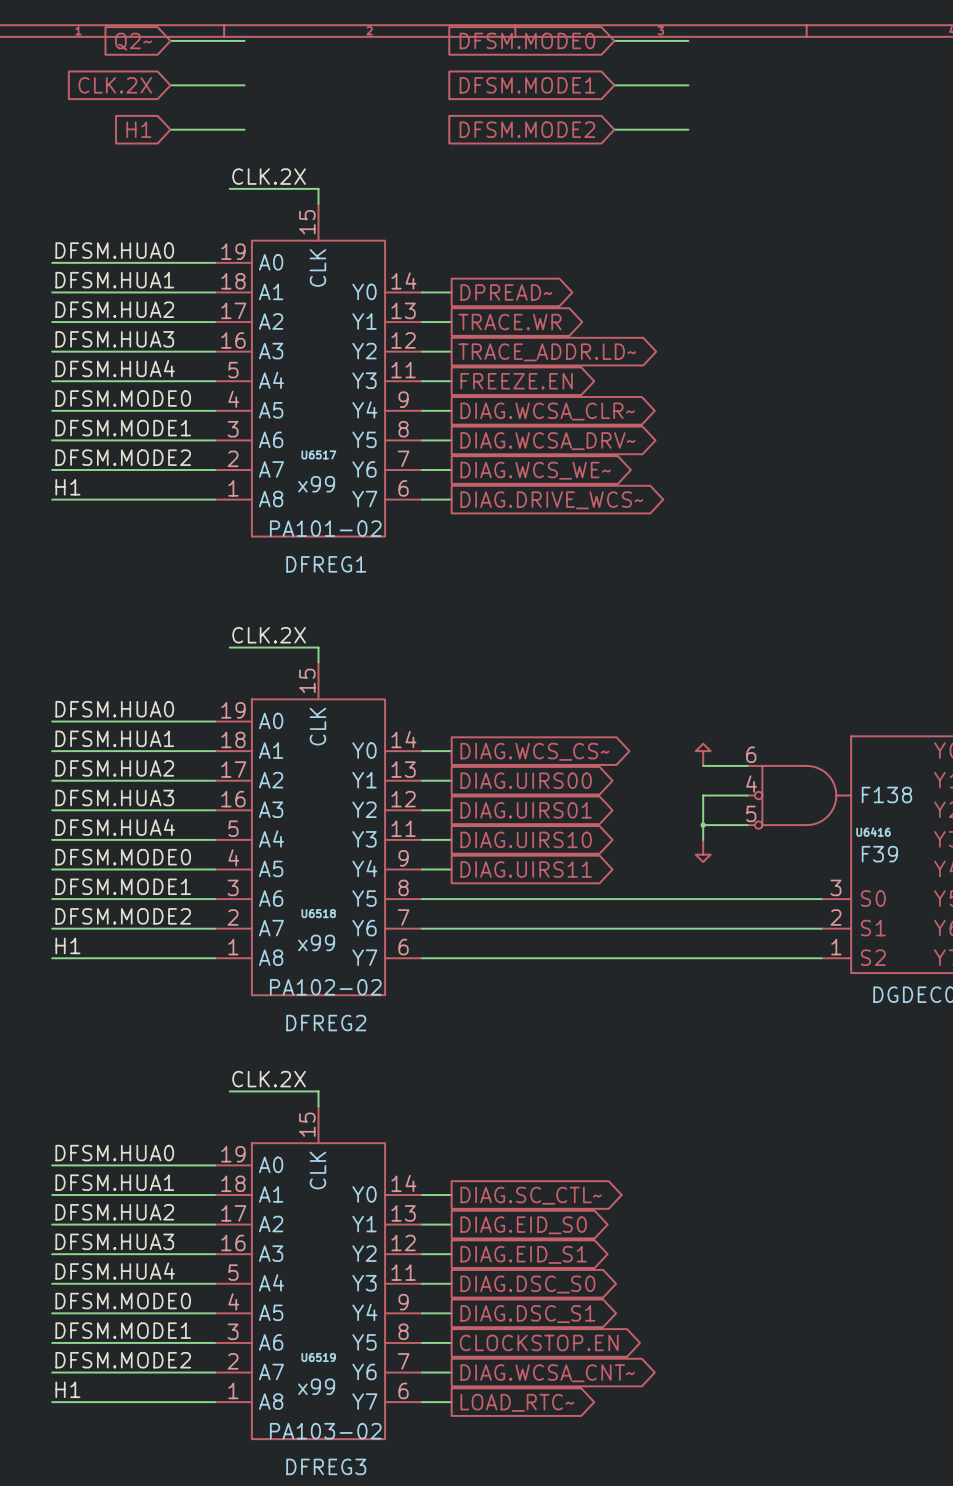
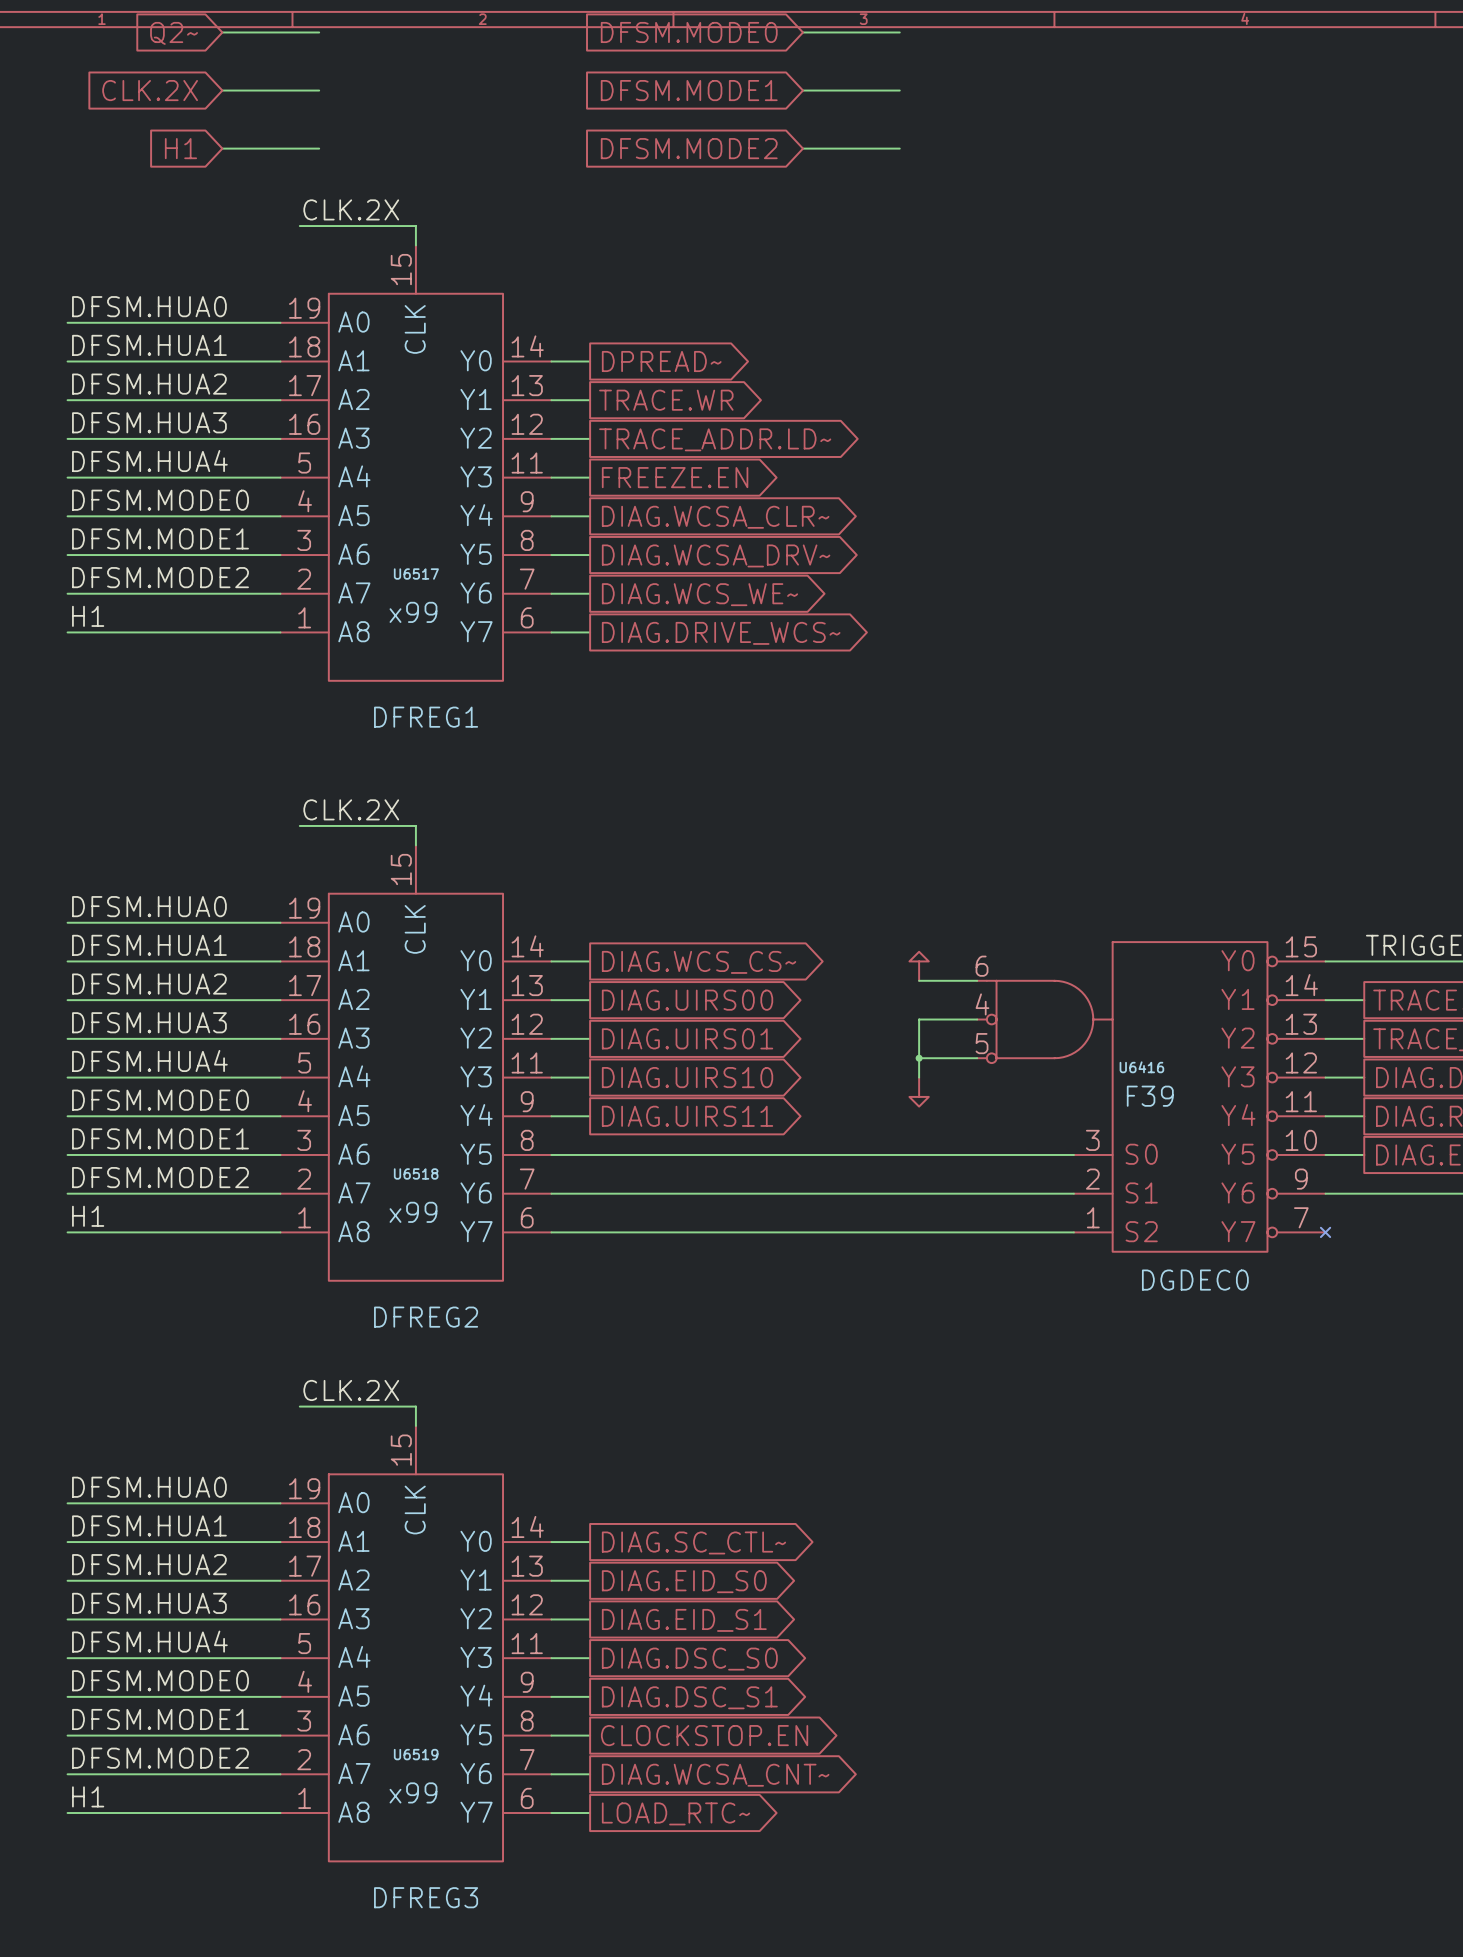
U6517 value: PA101-02 (325, 528) -> none
U6416 value: F138 (886, 794) -> none
U6518 value: PA102-02 (325, 987) -> none
U6519 value: PA103-02 (325, 1431) -> none

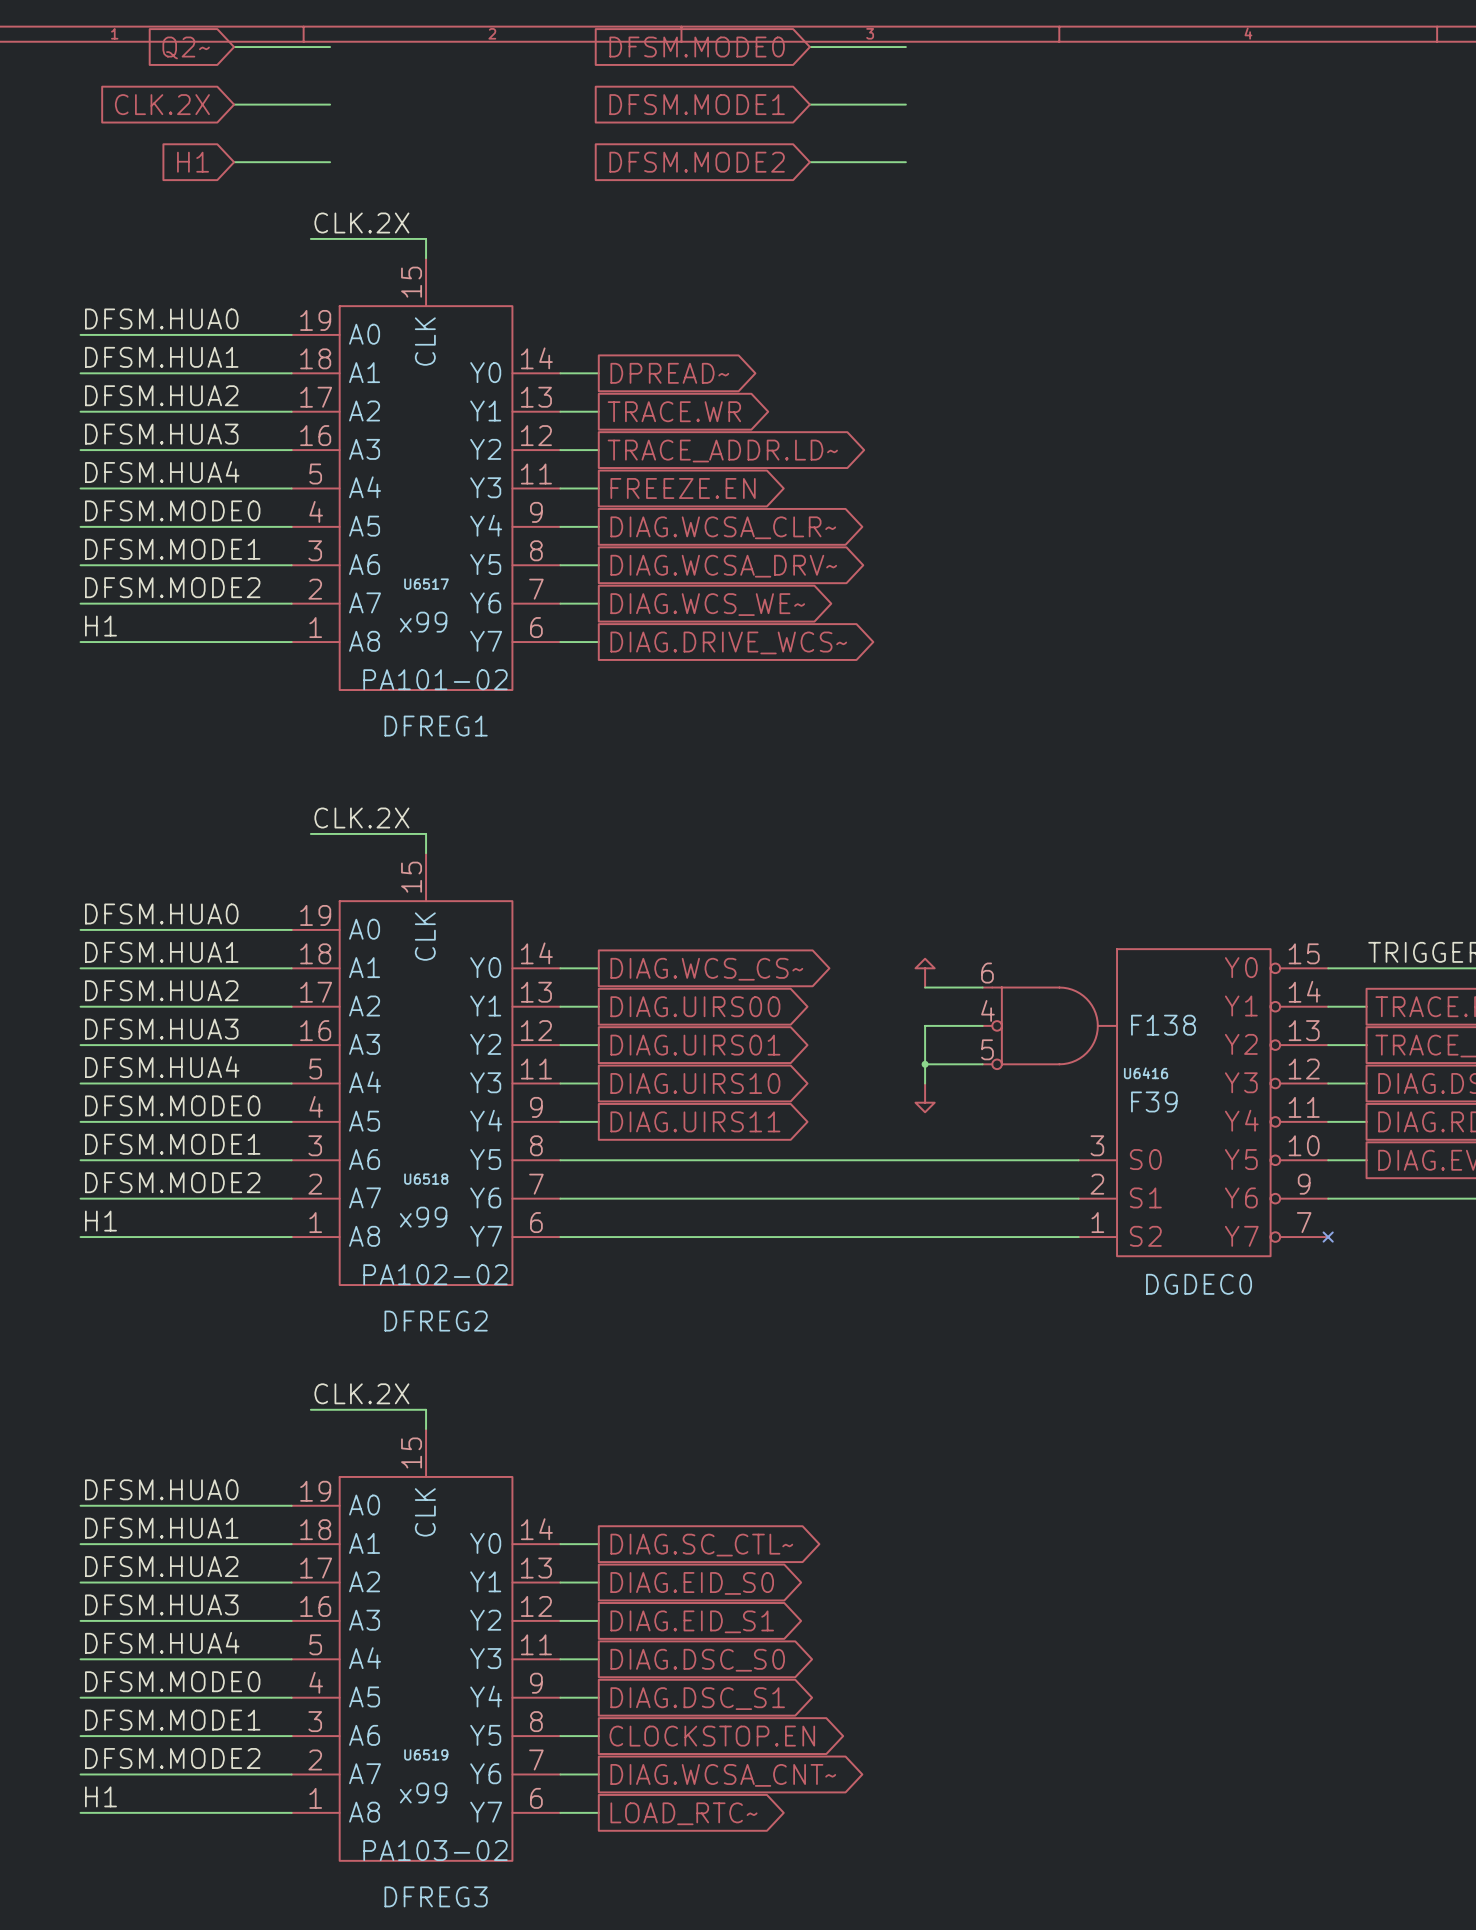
U6517 value: none -> PA101-02 (435, 679)
U6416 value: none -> F138 (1163, 1025)
U6518 value: none -> PA102-02 (435, 1274)
U6519 value: none -> PA103-02 (435, 1850)

